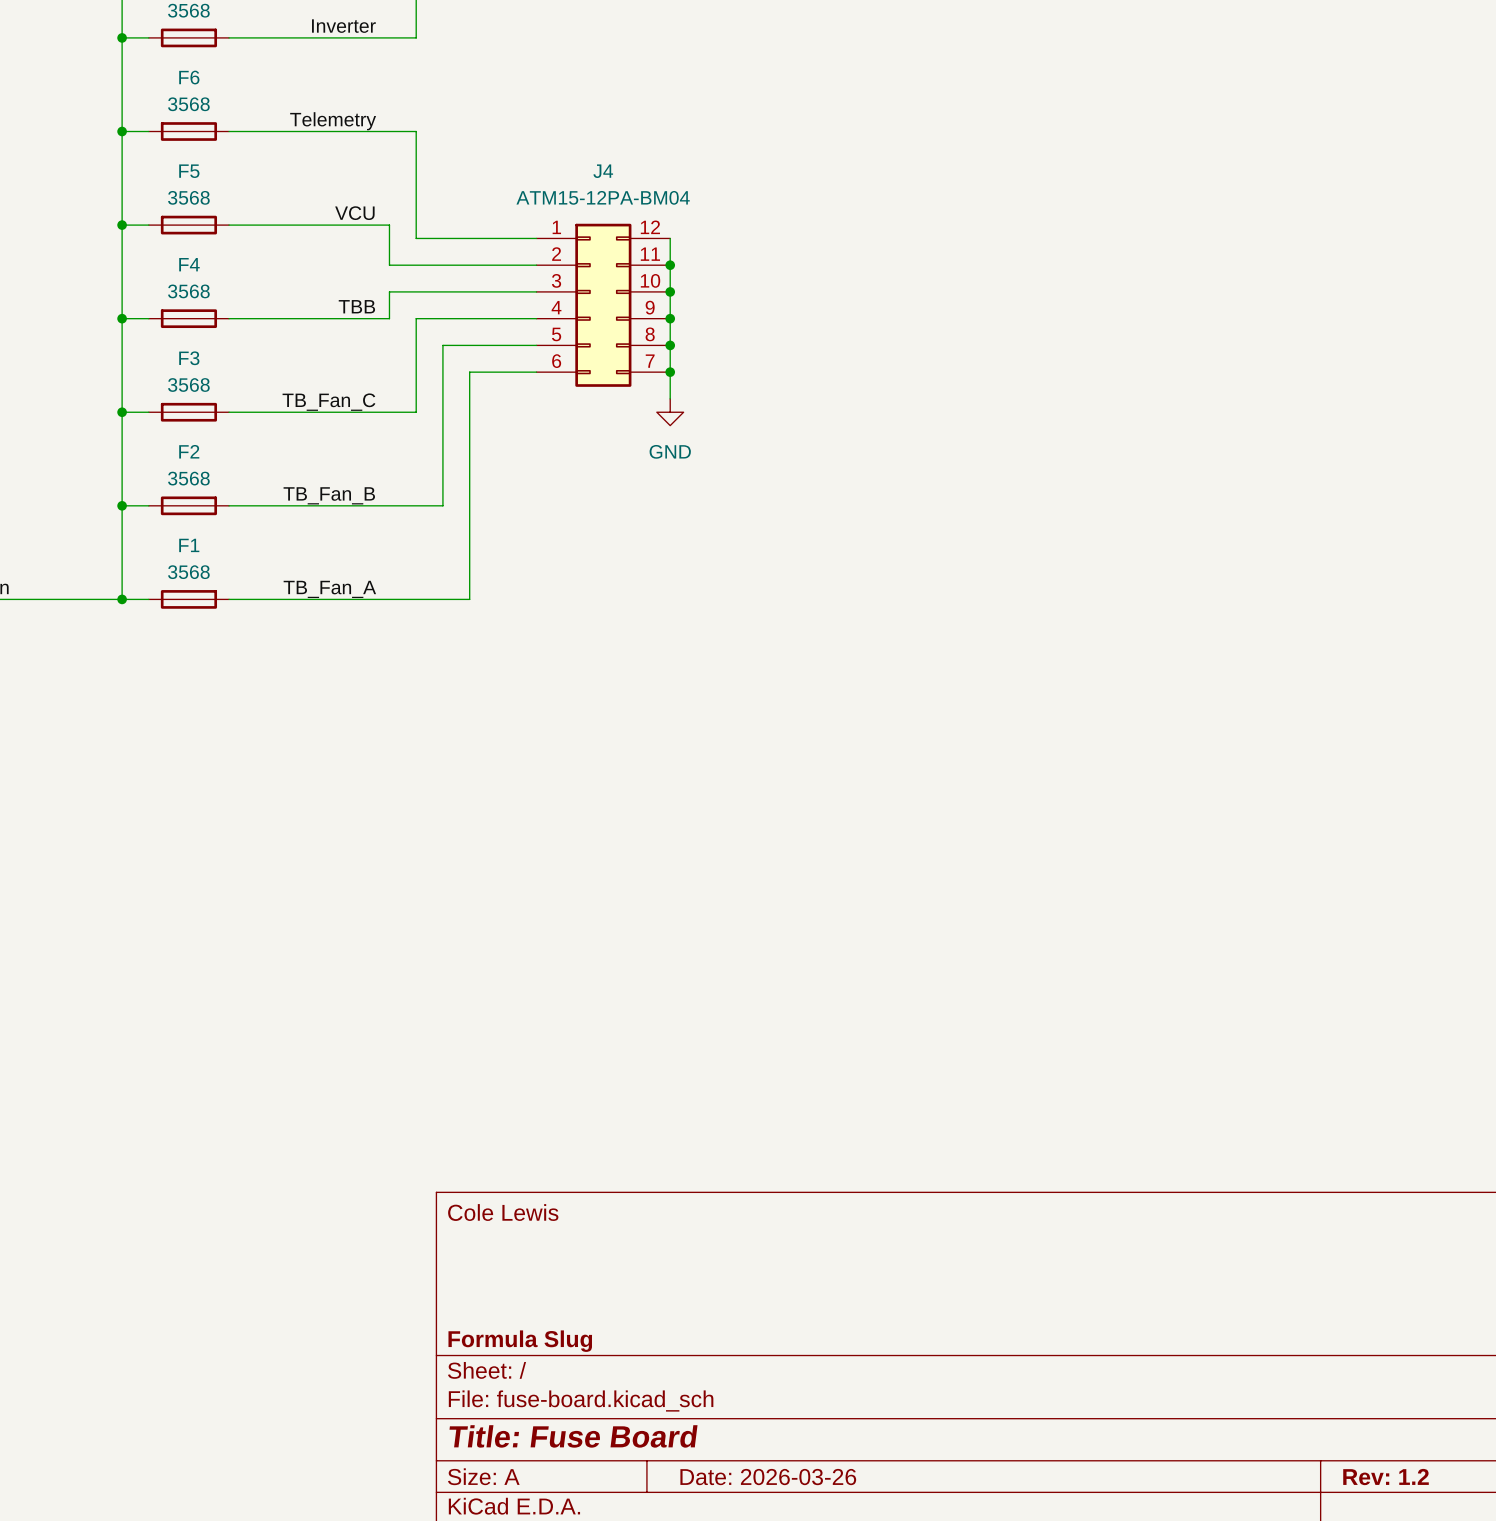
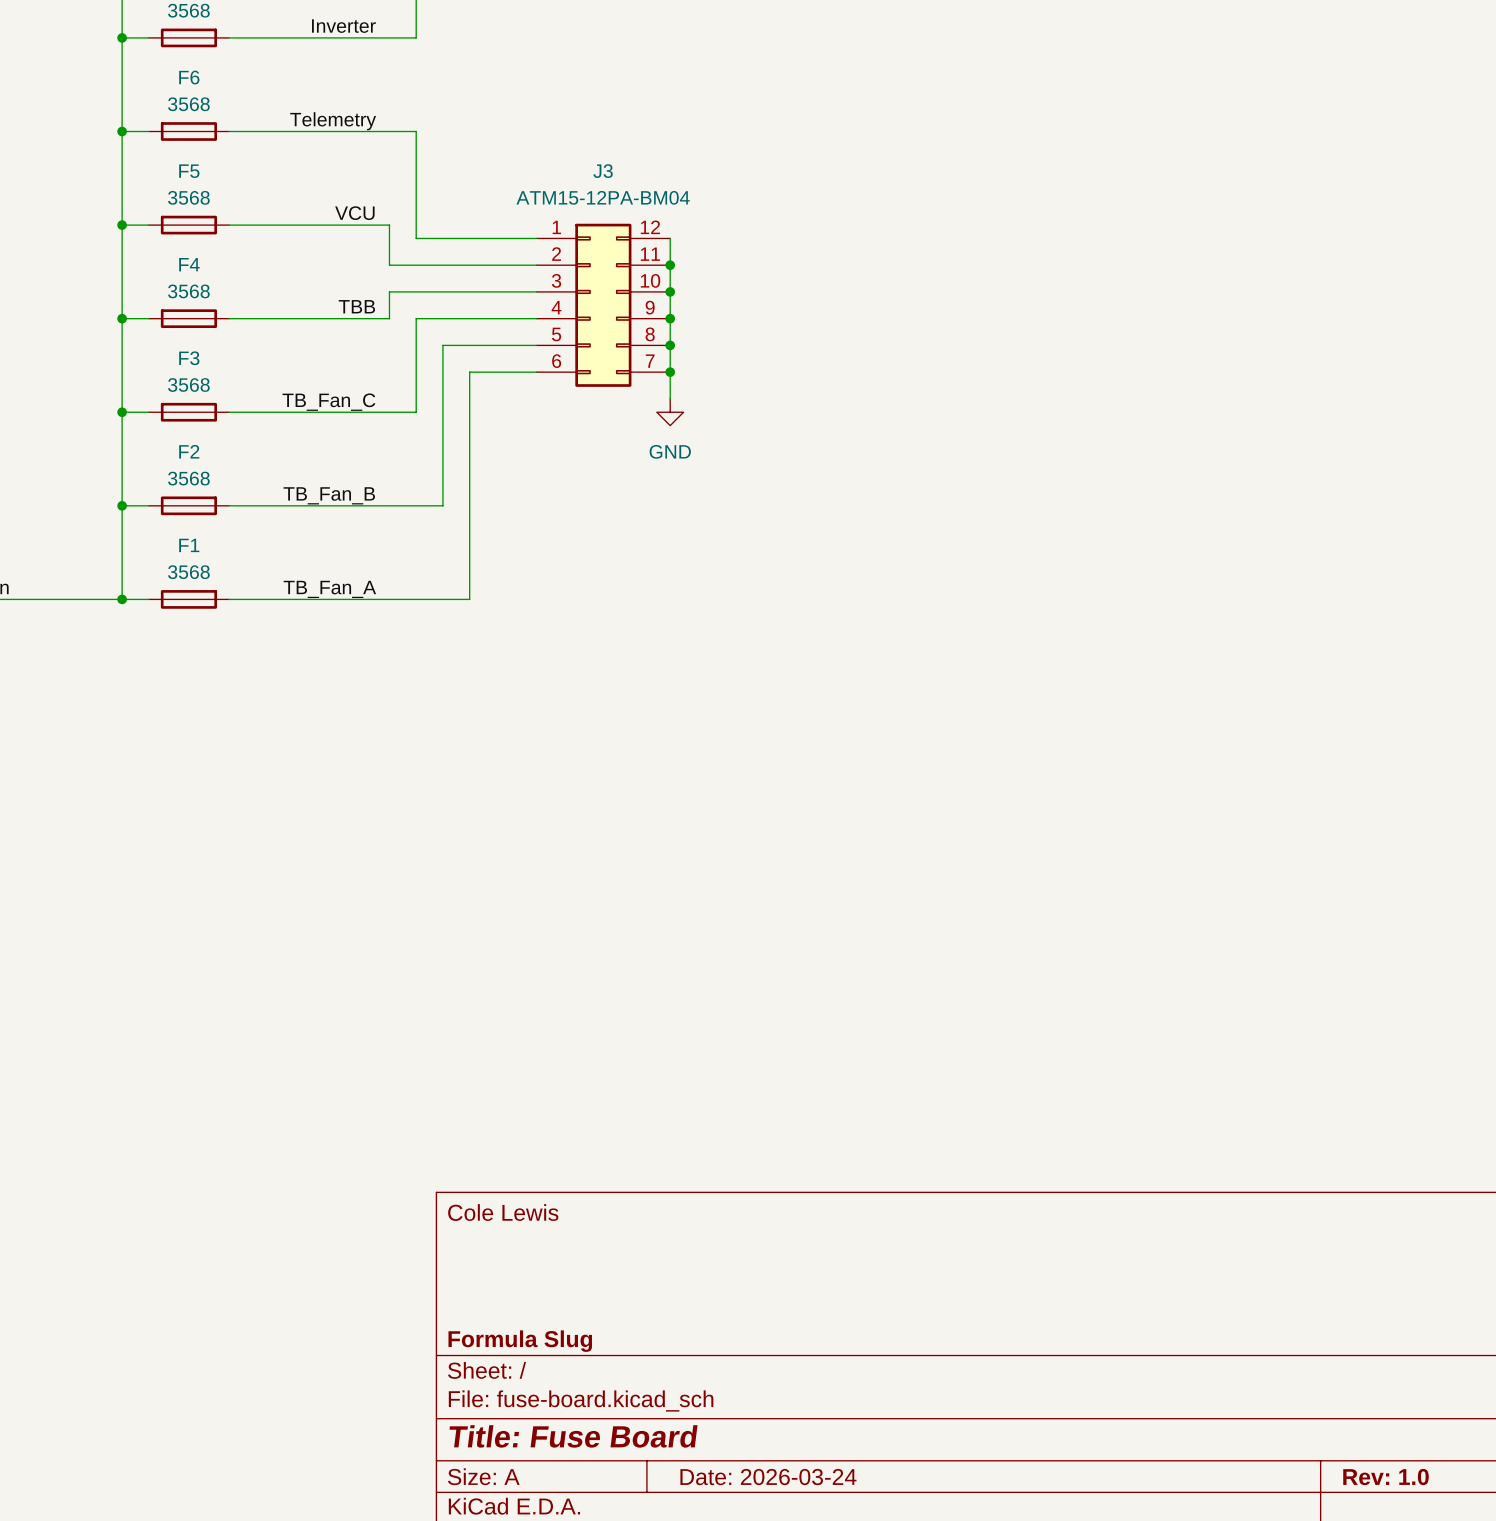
J4 name: J4 (603, 171) -> J3 (603, 171)
title block: Date: 2026-03-26 (768, 1477) -> Date: 2026-03-24 (768, 1477)
title block: Rev: 1.2 (1386, 1477) -> Rev: 1.0 (1386, 1477)

